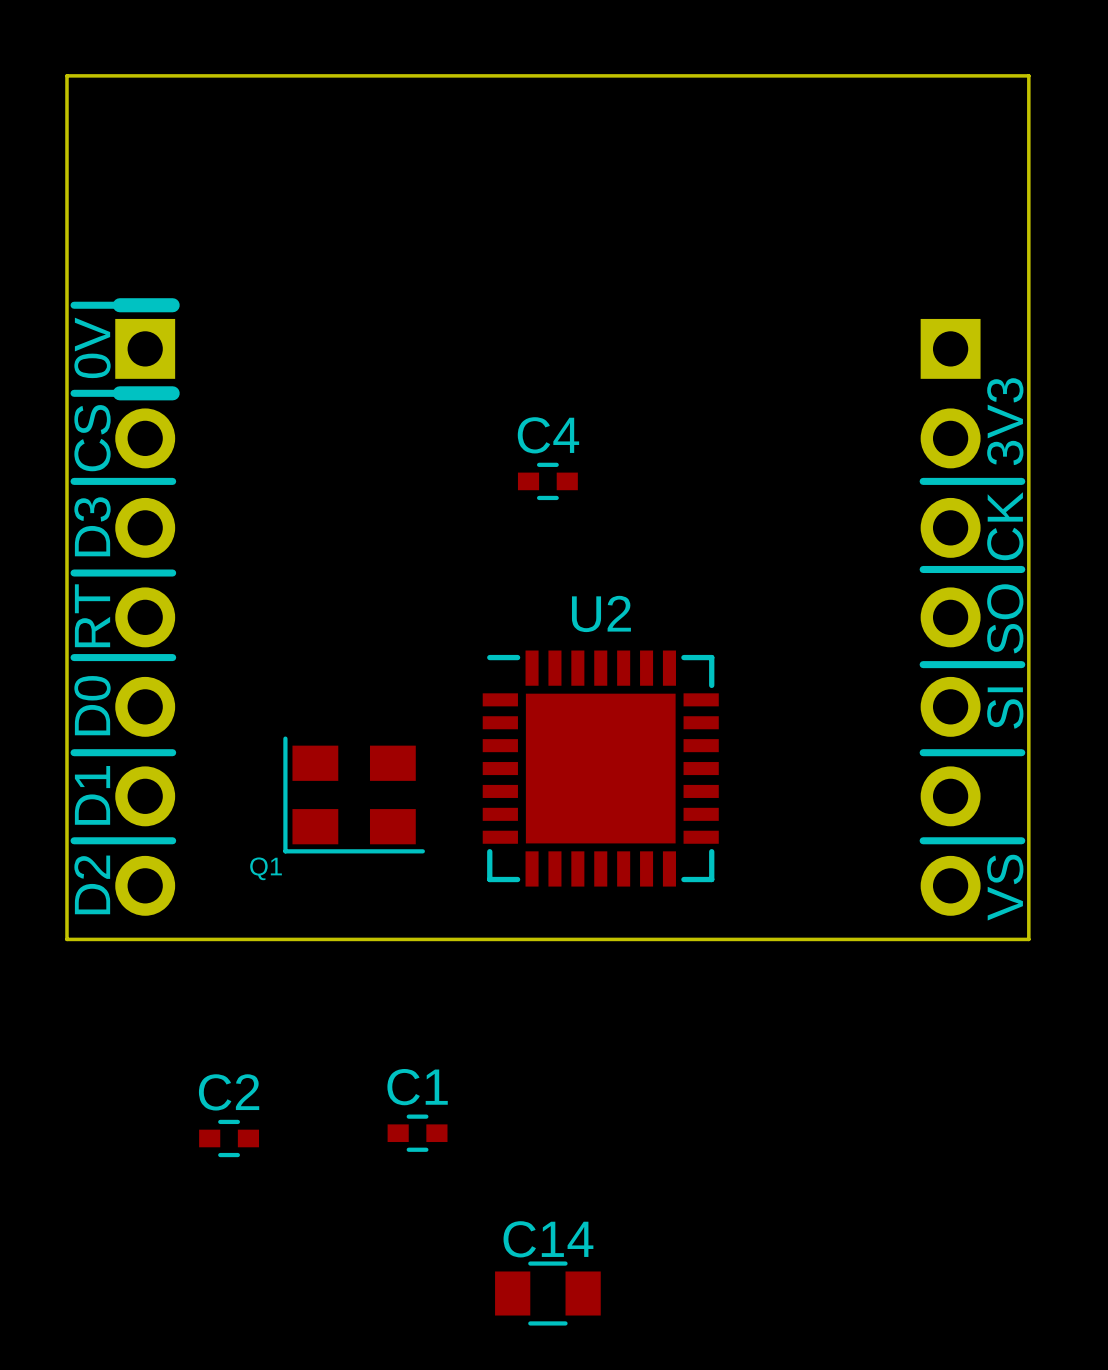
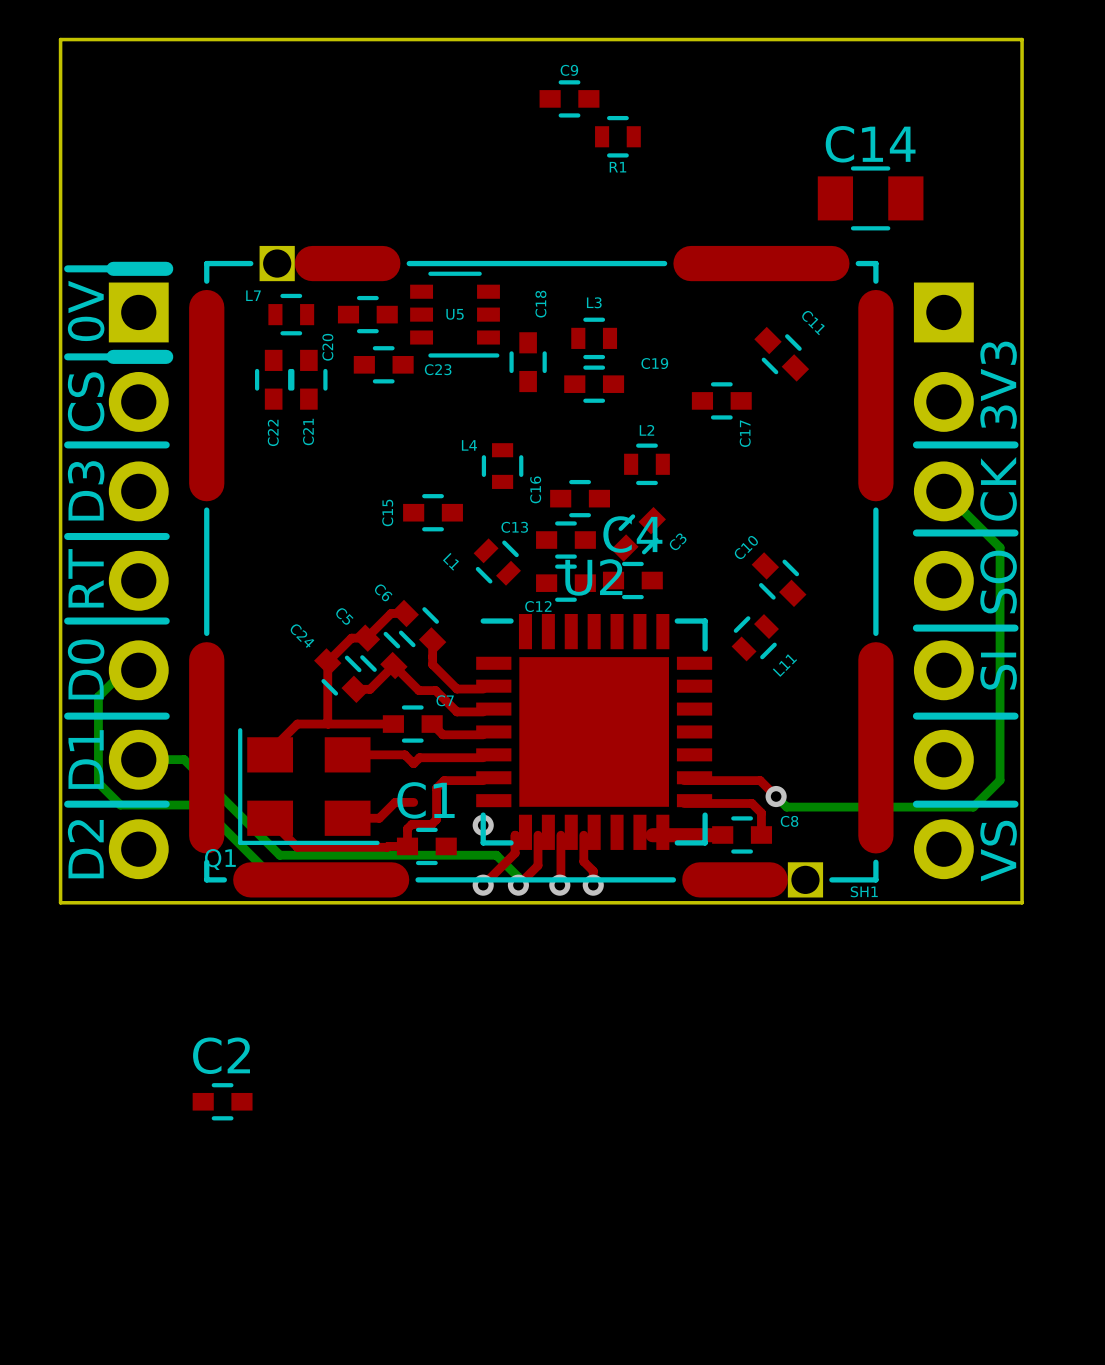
C9: none -> (569, 98)
R1: none -> (617, 136)
L7: none -> (291, 314)
C20: none -> (367, 314)
U5: none -> (455, 314)
L3: none -> (594, 338)
C11: none -> (781, 354)
C18: none -> (528, 362)
C23: none -> (383, 364)
C22: none -> (273, 379)
C21: none -> (308, 379)
C19: none -> (594, 384)
C17: none -> (721, 400)
C4 position: (547, 481) -> (632, 580)
L2: none -> (646, 464)
L4: none -> (502, 466)
bottom track: none -> (943, 491) (1000, 547) (1000, 780) (973, 807) (786, 807) (776, 796)
C16: none -> (580, 498)
C15: none -> (433, 512)
C3: none -> (638, 534)
C13: none -> (565, 540)
L1: none -> (497, 562)
SH1: none -> (541, 571)
C10: none -> (779, 579)
C12: none -> (565, 583)
top track: none -> (405, 613) (391, 613) (366, 638) (351, 638) (327, 661) (327, 723)
C6: none -> (418, 627)
L11: none -> (755, 637)
top track: none -> (432, 640) (432, 664) (457, 689) (483, 689)
C5: none -> (380, 651)
bottom track: none -> (139, 670) (125, 670) (98, 696) (98, 783) (120, 805) (200, 805) (275, 879)
C24: none -> (341, 675)
top track: none -> (355, 689) (370, 689) (393, 665) (418, 690) (435, 690) (457, 711) (483, 711)
top track: none -> (393, 724) (297, 724) (270, 751) (270, 754)
C7: none -> (412, 724)
top track: none -> (432, 724) (442, 734) (483, 734)
top track: none -> (347, 754) (404, 754) (413, 763) (419, 757) (483, 757)
Q1 position: (354, 794) -> (308, 786)
bottom track: none -> (139, 759) (184, 759) (279, 855) (496, 855) (518, 877) (518, 885)
top track: none -> (483, 780) (444, 780) (436, 788) (436, 819) (431, 824) (411, 824) (407, 828) (407, 846) (297, 847) (270, 818)
top track: none -> (684, 780) (760, 780) (776, 796)
via: none -> (776, 796)
top track: none -> (413, 802) (395, 802) (379, 818) (347, 818)
top track: none -> (684, 803) (751, 803) (761, 812) (761, 834)
via: none -> (483, 825)
top track: none -> (515, 835) (515, 853) (483, 885)
top track: none -> (538, 835) (538, 865) (518, 885)
top track: none -> (560, 835) (559, 885)
top track: none -> (583, 835) (583, 861) (593, 871) (593, 885)
top track: none -> (652, 835) (722, 835)
C8: none -> (742, 834)
via: none -> (483, 885)
via: none -> (518, 885)
via: none -> (559, 885)
via: none -> (593, 885)
C1 position: (417, 1133) -> (426, 846)
C14 position: (547, 1293) -> (870, 198)

